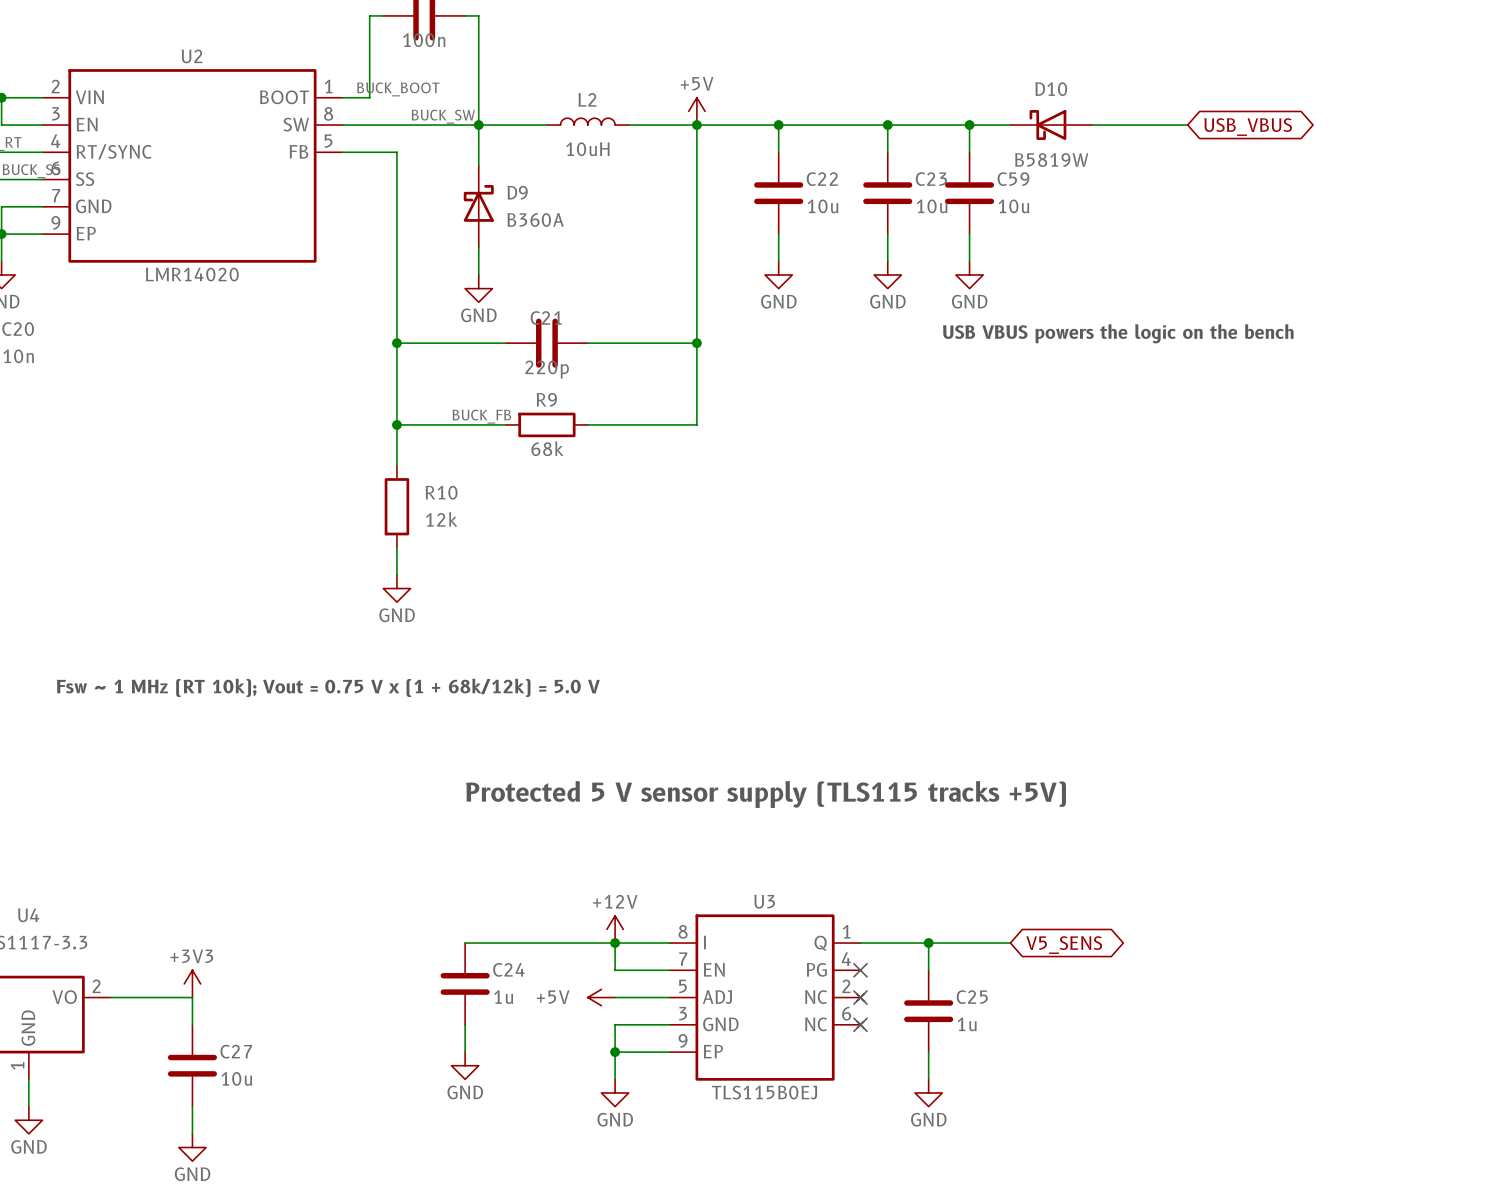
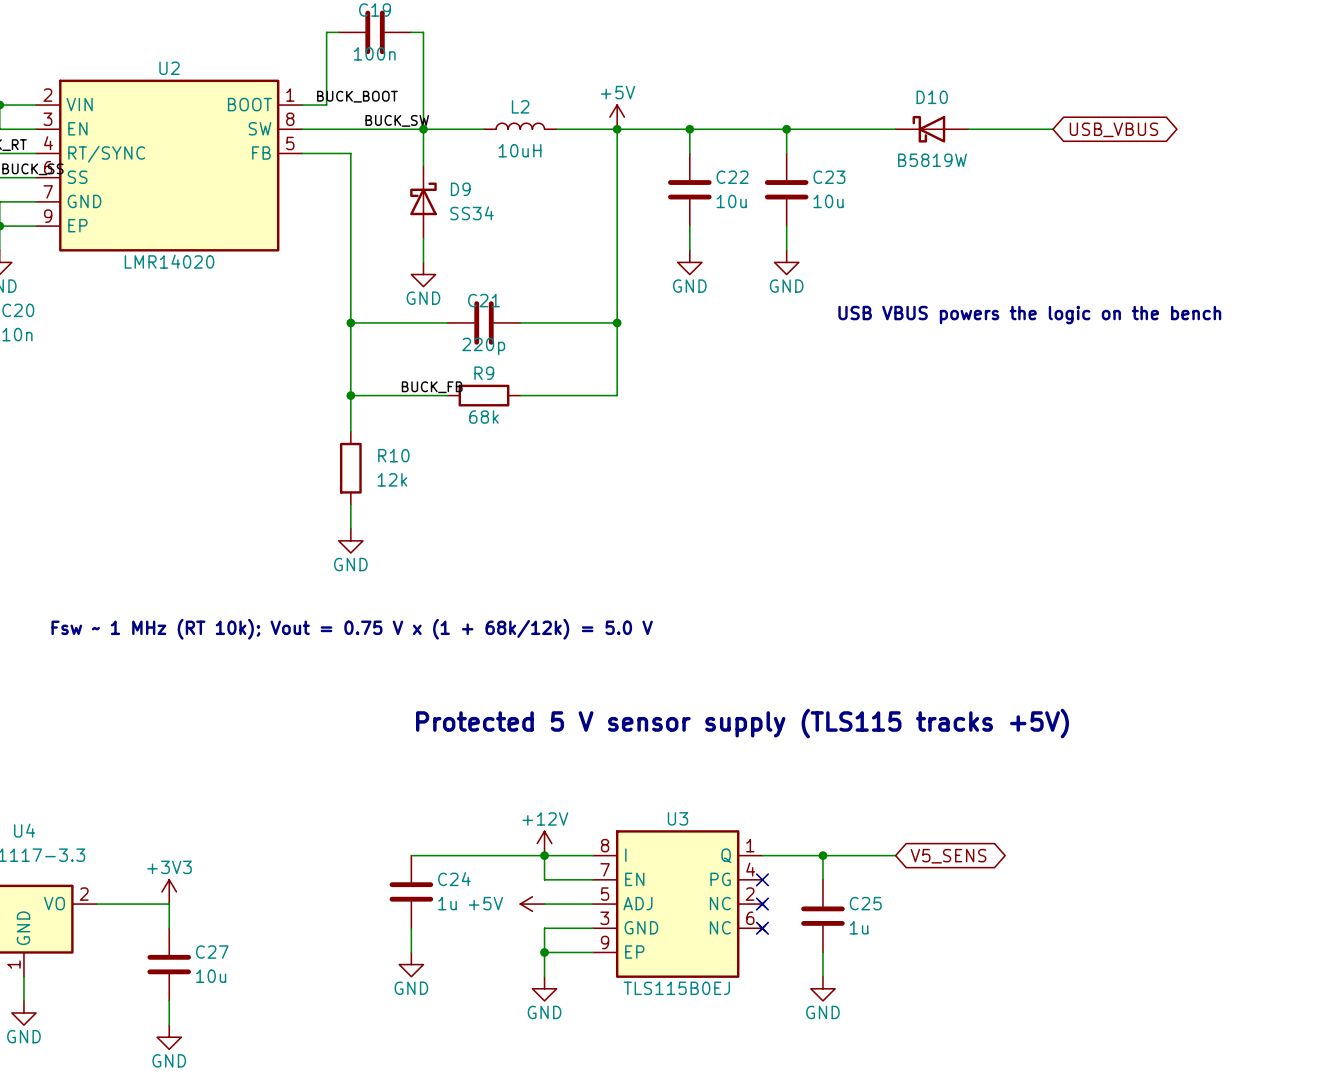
wire: (969, 125) (969, 152) -> none
junction: (969, 125) -> none
C59: 10u (969, 193) -> none
D9 value: B360A (535, 220) -> SS34 (471, 213)
wire: (969, 234) (969, 261) -> none
power symbol: GND (969, 274) -> none

